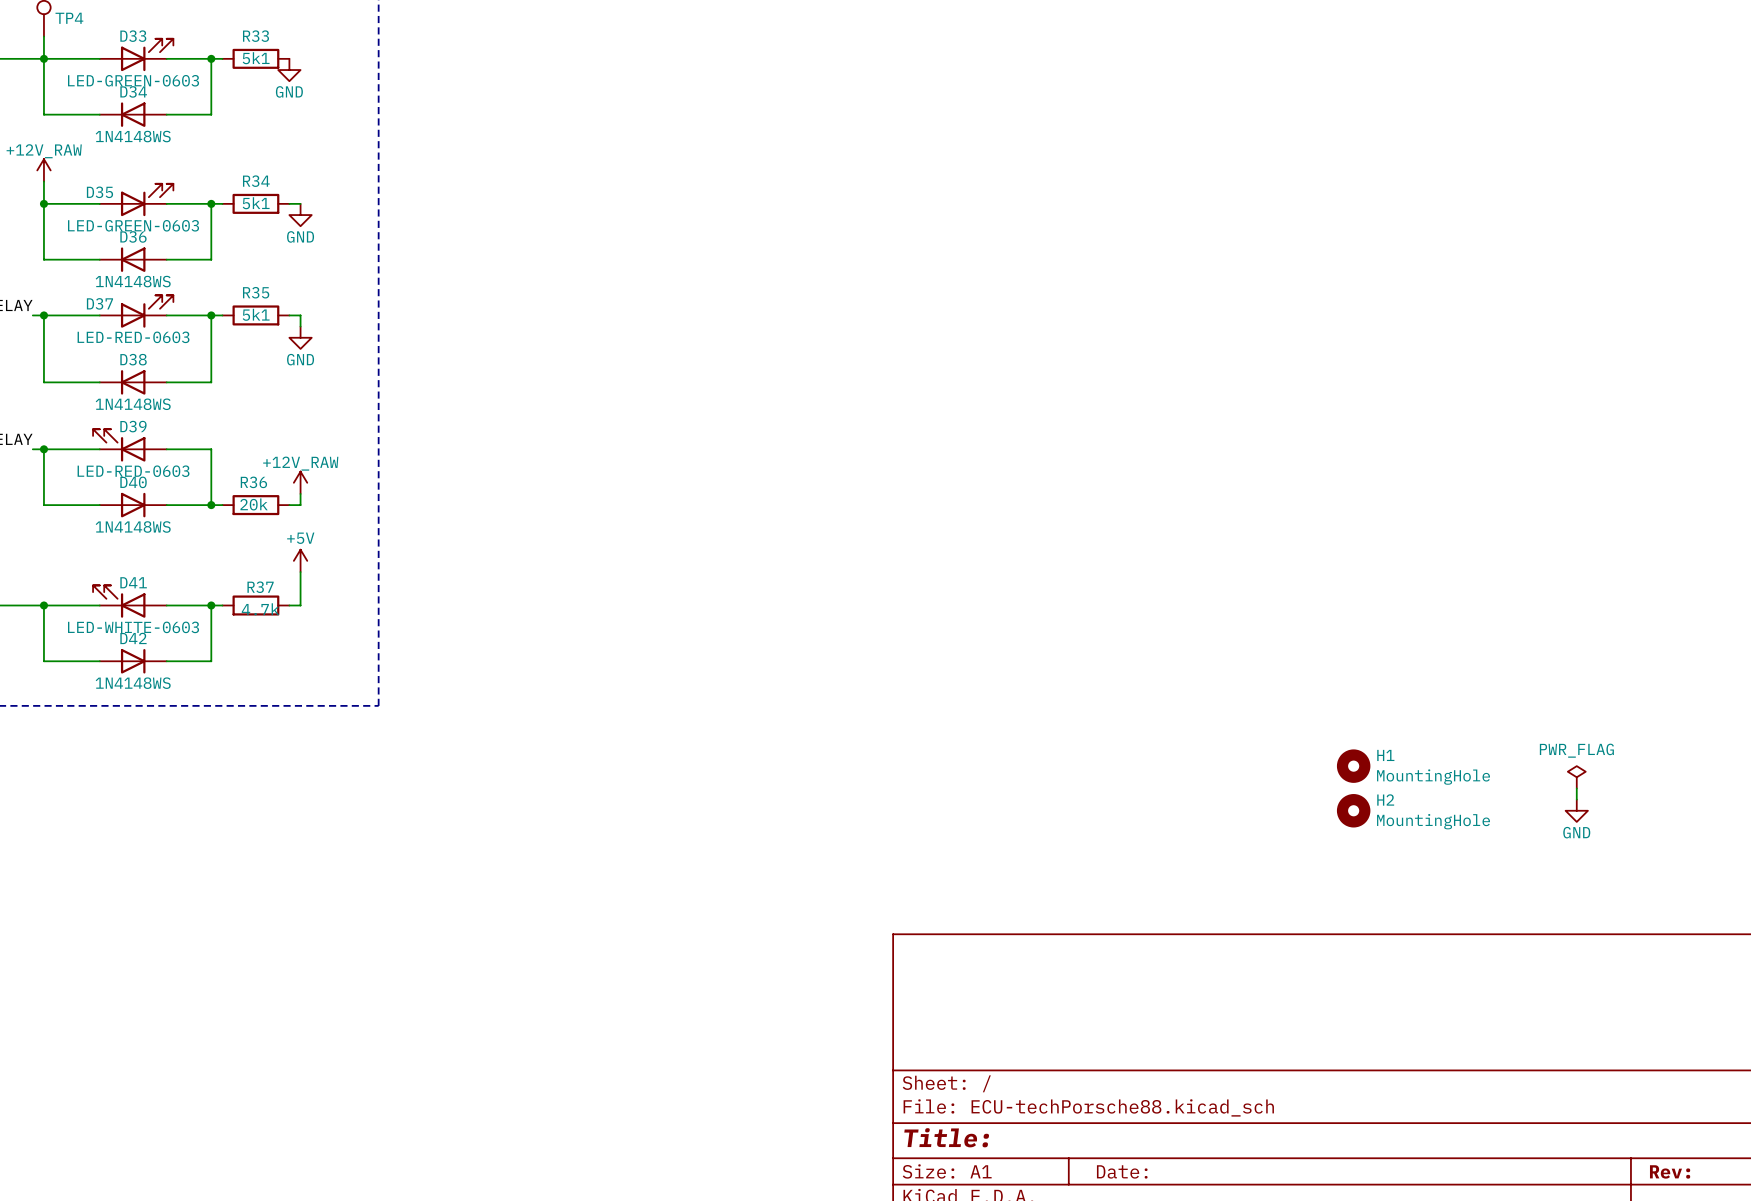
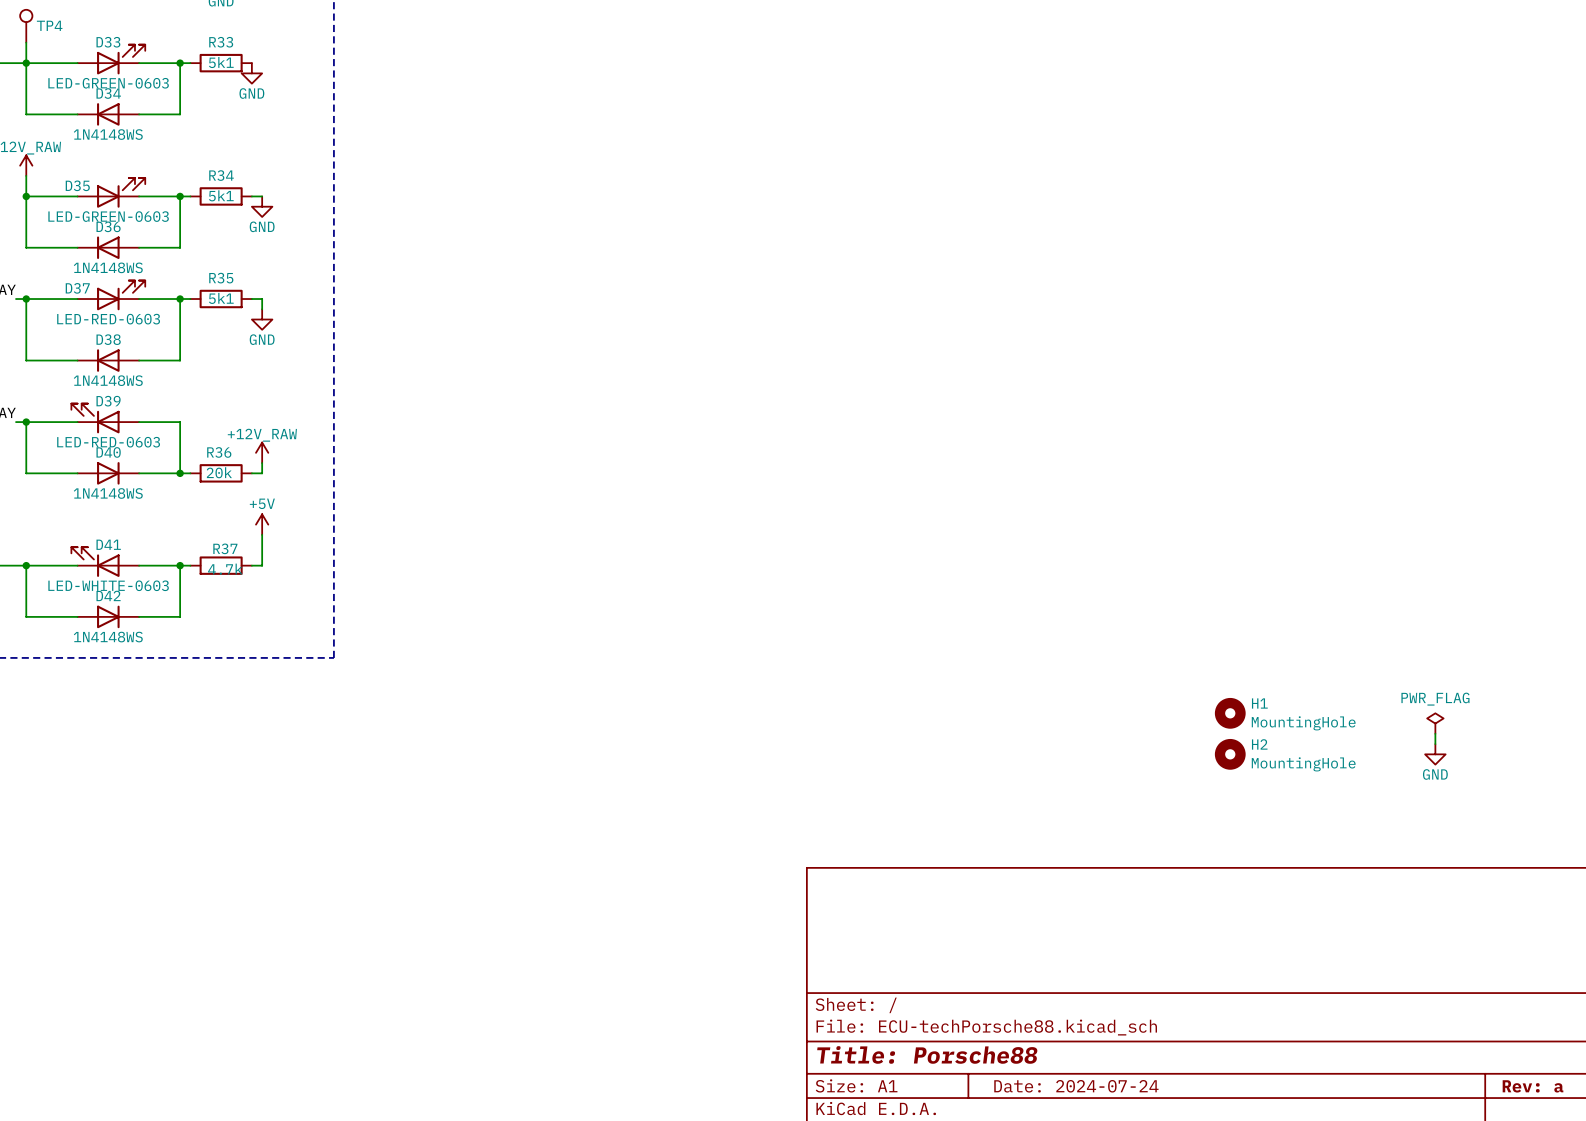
title block: Title: (946, 1137) -> Title: Porsche88 (927, 1054)
title block: Date: (1122, 1171) -> Date: 2024-07-24 (1076, 1086)
title block: Rev: (1670, 1171) -> Rev: a (1533, 1086)

